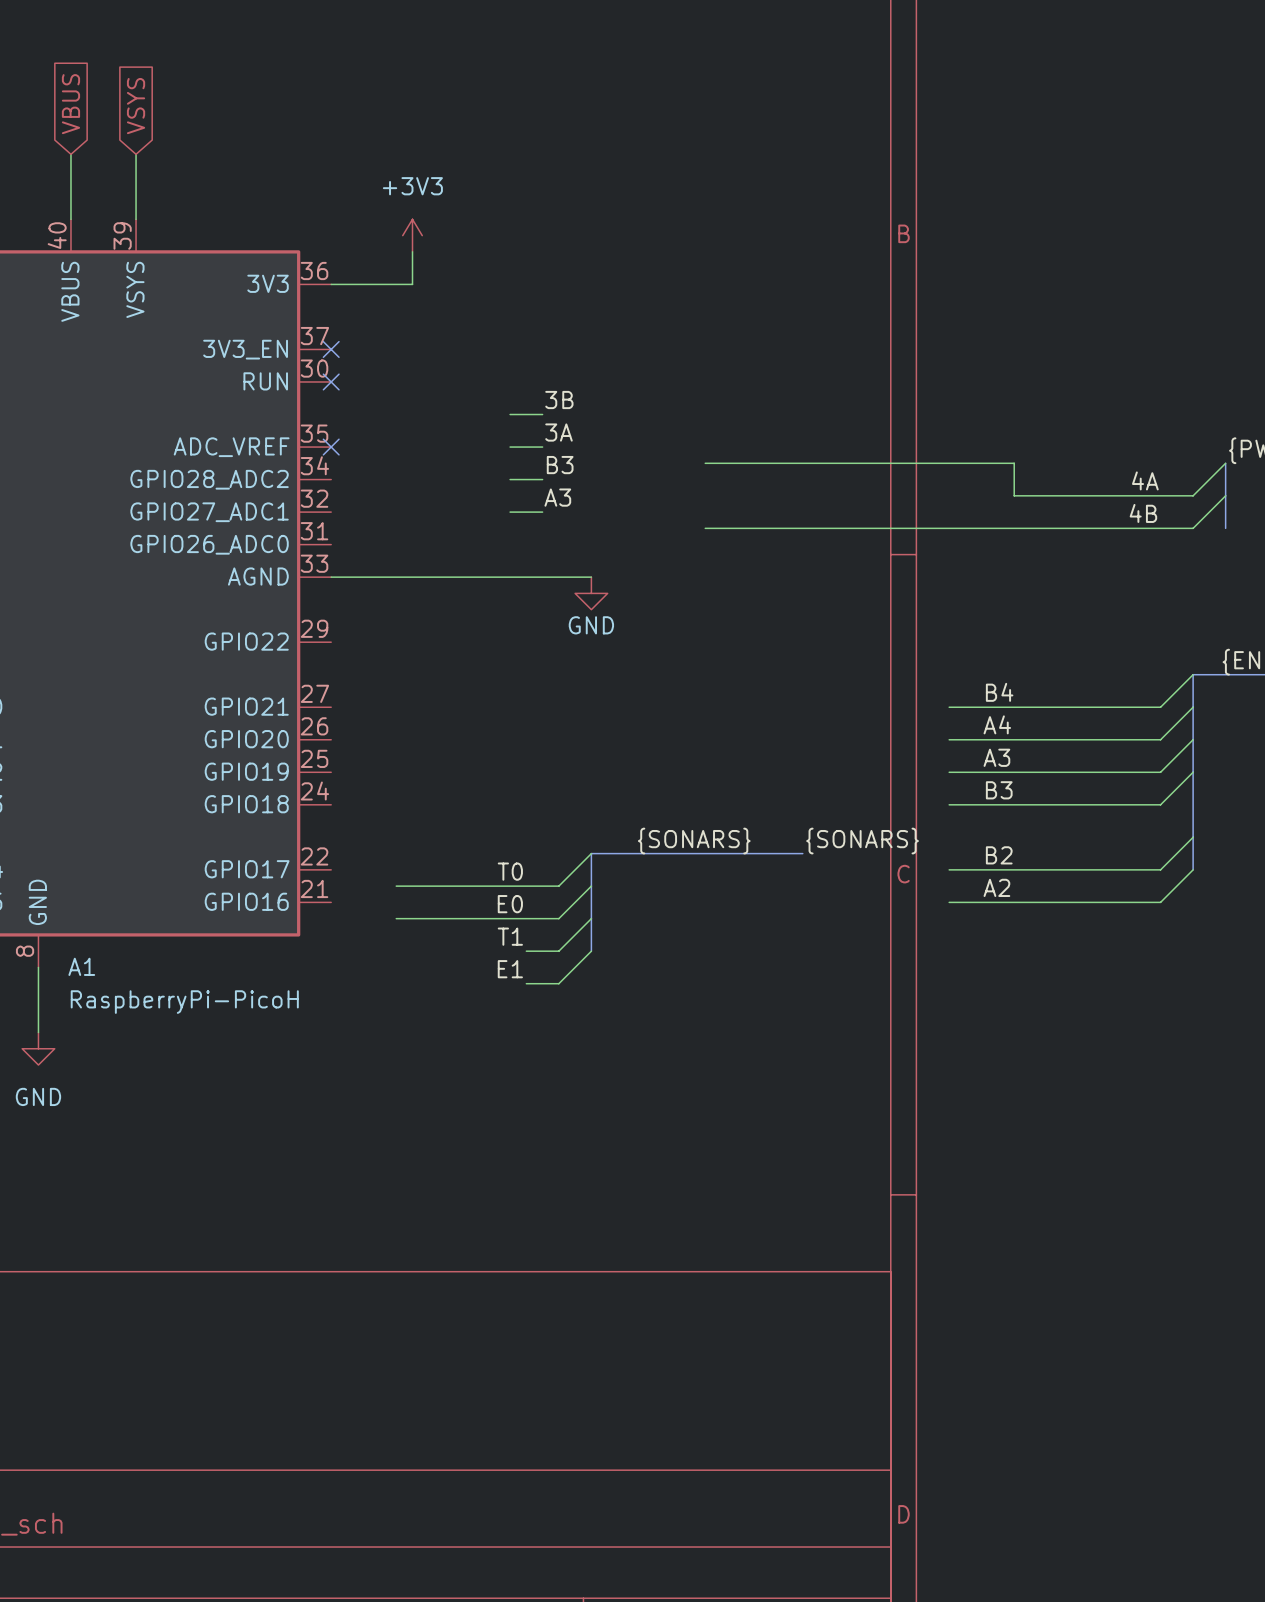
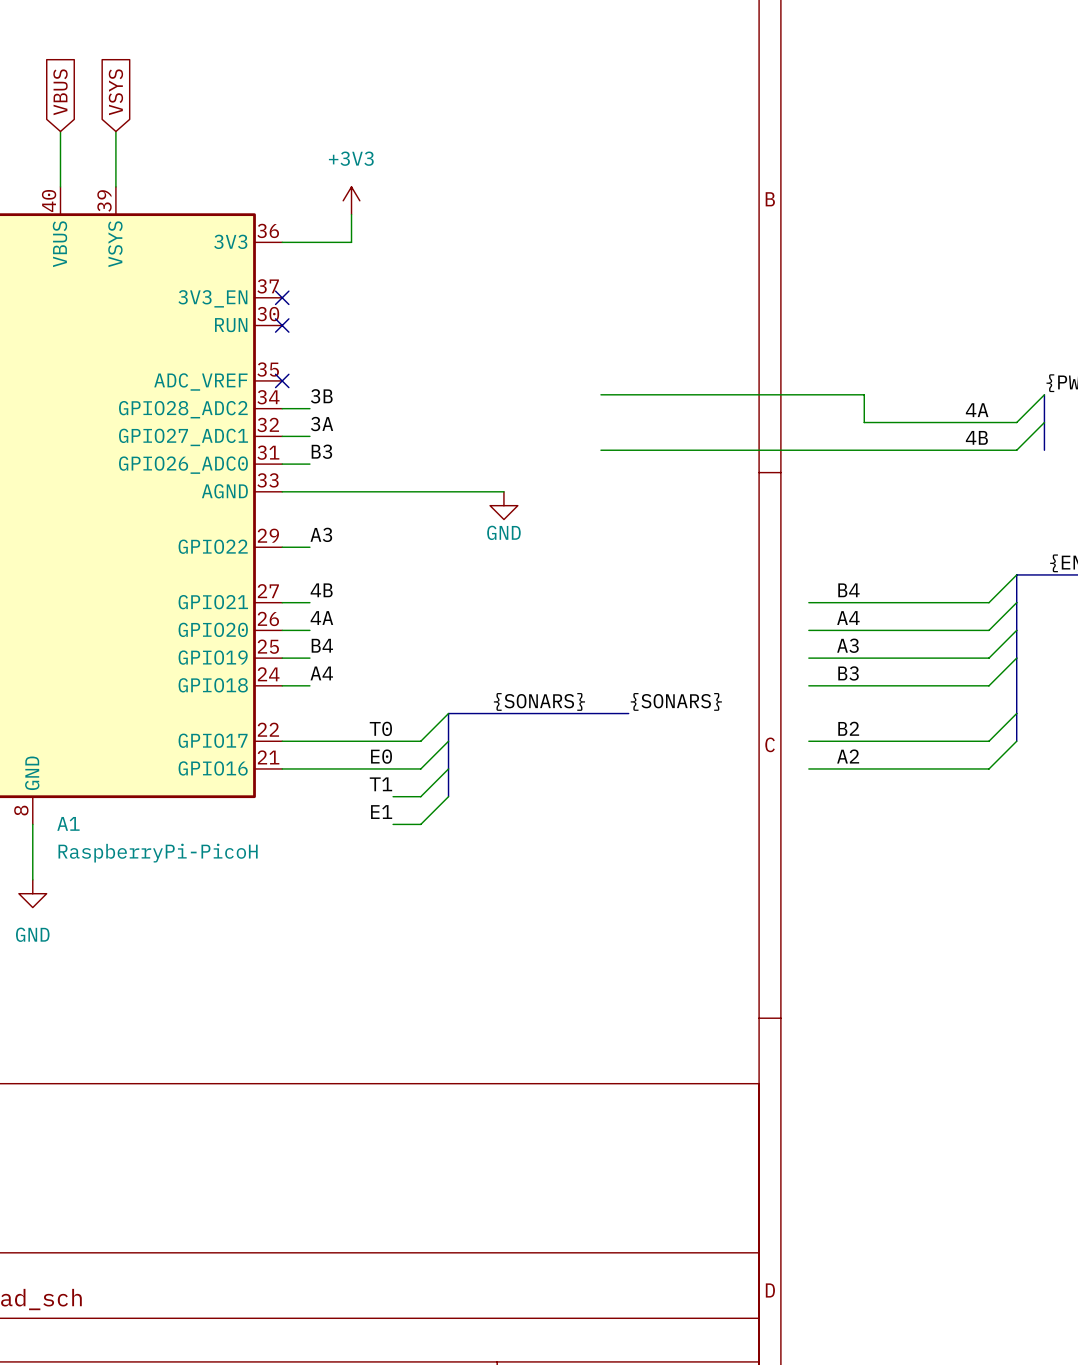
label position: 3B (559, 400) -> 3B (321, 396)
wire: (510, 414) (542, 414) -> (282, 547) (309, 547)
label position: 3A (558, 432) -> 3A (322, 424)
wire: (510, 447) (542, 447) -> (282, 408) (309, 408)
label position: B3 (560, 465) -> B3 (321, 451)
wire: (510, 479) (542, 479) -> (282, 436) (309, 436)
label position: A3 (557, 497) -> A3 (321, 534)
wire: (510, 512) (542, 512) -> (282, 464) (309, 464)
label: none -> 4B (321, 590)
wire: none -> (282, 602) (309, 602)
label: none -> 4A (321, 618)
wire: none -> (282, 630) (309, 630)
label: none -> B4 (322, 645)
wire: none -> (282, 658) (309, 658)
label: none -> A4 (321, 673)
wire: none -> (282, 685) (309, 685)
label: none -> {SONARS} (539, 701)
label position: {SONARS} (694, 841) -> {SONARS} (676, 701)
label: {SONARS} (862, 841) -> none
wire: (591, 853) (558, 886) (396, 886) -> (448, 713) (420, 741) (282, 741)
bus: (802, 853) (591, 853) (591, 951) -> (628, 713) (448, 713) (448, 796)
label position: T0 (510, 871) -> T0 (380, 728)
wire: (591, 886) (558, 918) (396, 918) -> (448, 741) (420, 768) (282, 768)
label position: E0 (510, 904) -> E0 (381, 756)
wire: (591, 918) (558, 951) (526, 951) -> (448, 768) (420, 796) (393, 796)
label position: T1 (510, 936) -> T1 (380, 784)
wire: (591, 951) (558, 983) (526, 983) -> (448, 796) (420, 824) (393, 824)
label position: E1 (510, 969) -> E1 (381, 812)

